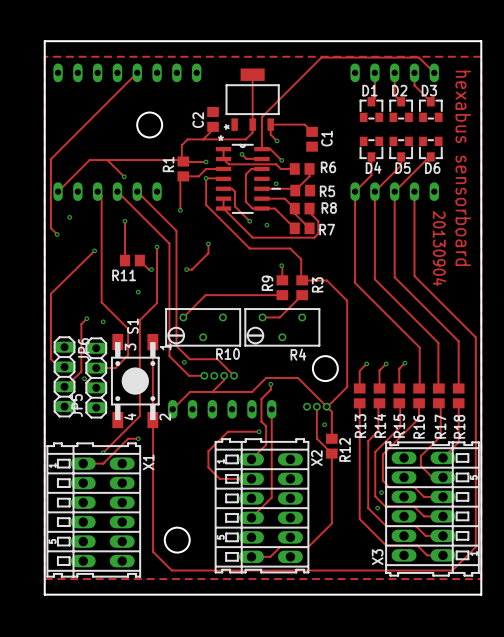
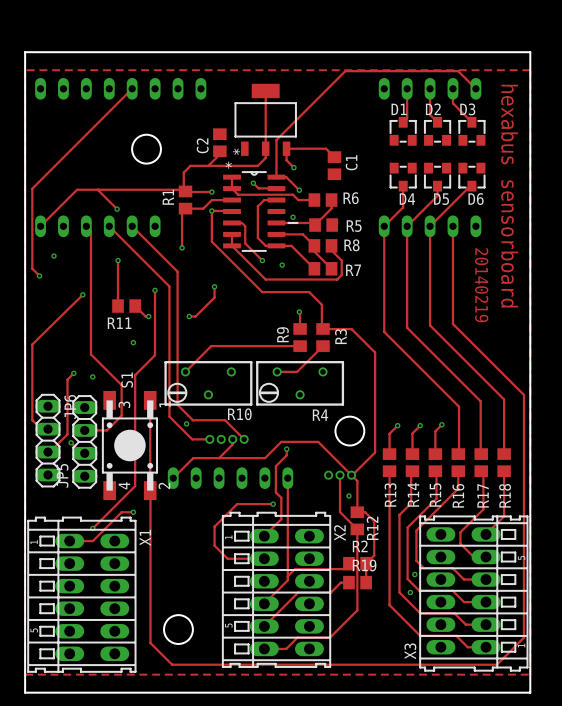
text: 20130904 (439, 248) -> 20140219 (481, 285)
track: none -> (357, 512) (365, 512) (374, 521) (374, 555) (366, 563) (366, 582)
track: none -> (348, 563) (343, 569) (295, 569) (287, 576)
R2: none -> (357, 563)
track: none -> (348, 582) (340, 582) (330, 592) (298, 592) (264, 626)
R19: none -> (357, 582)

